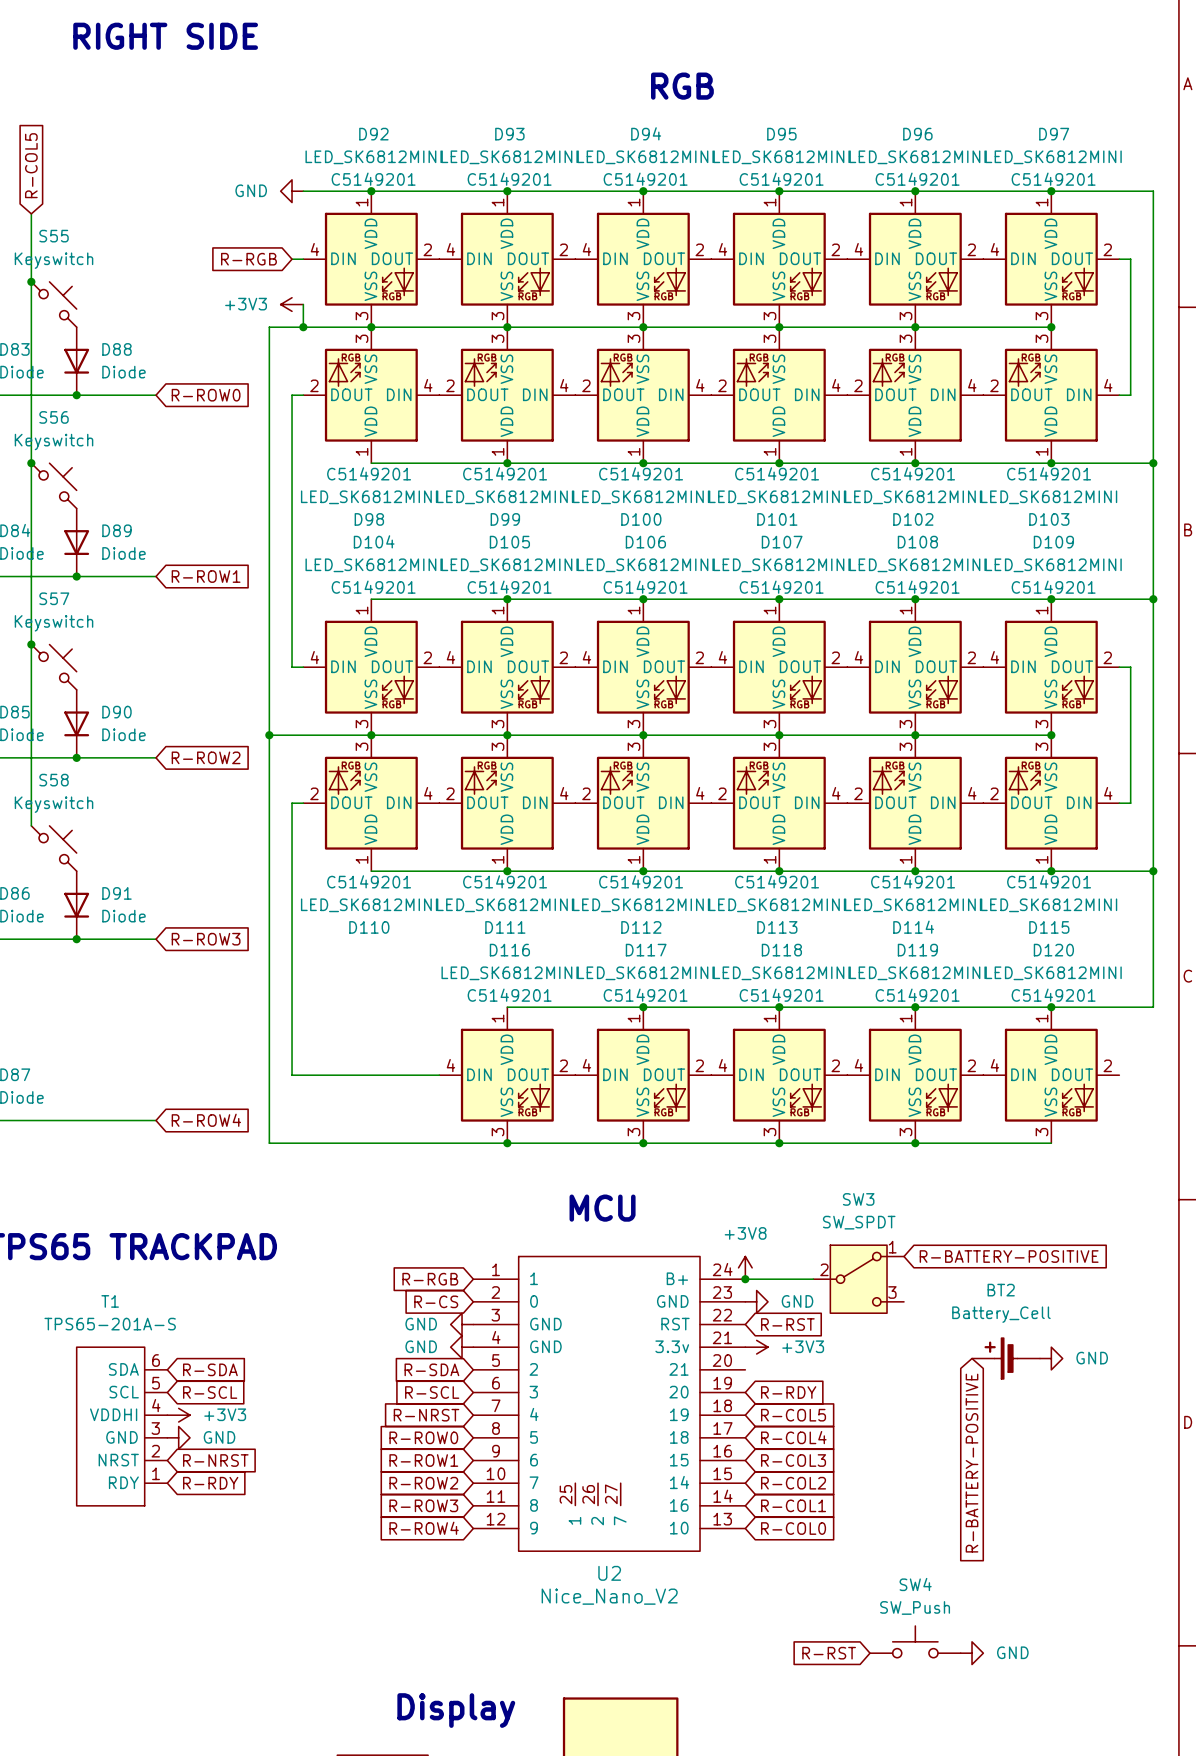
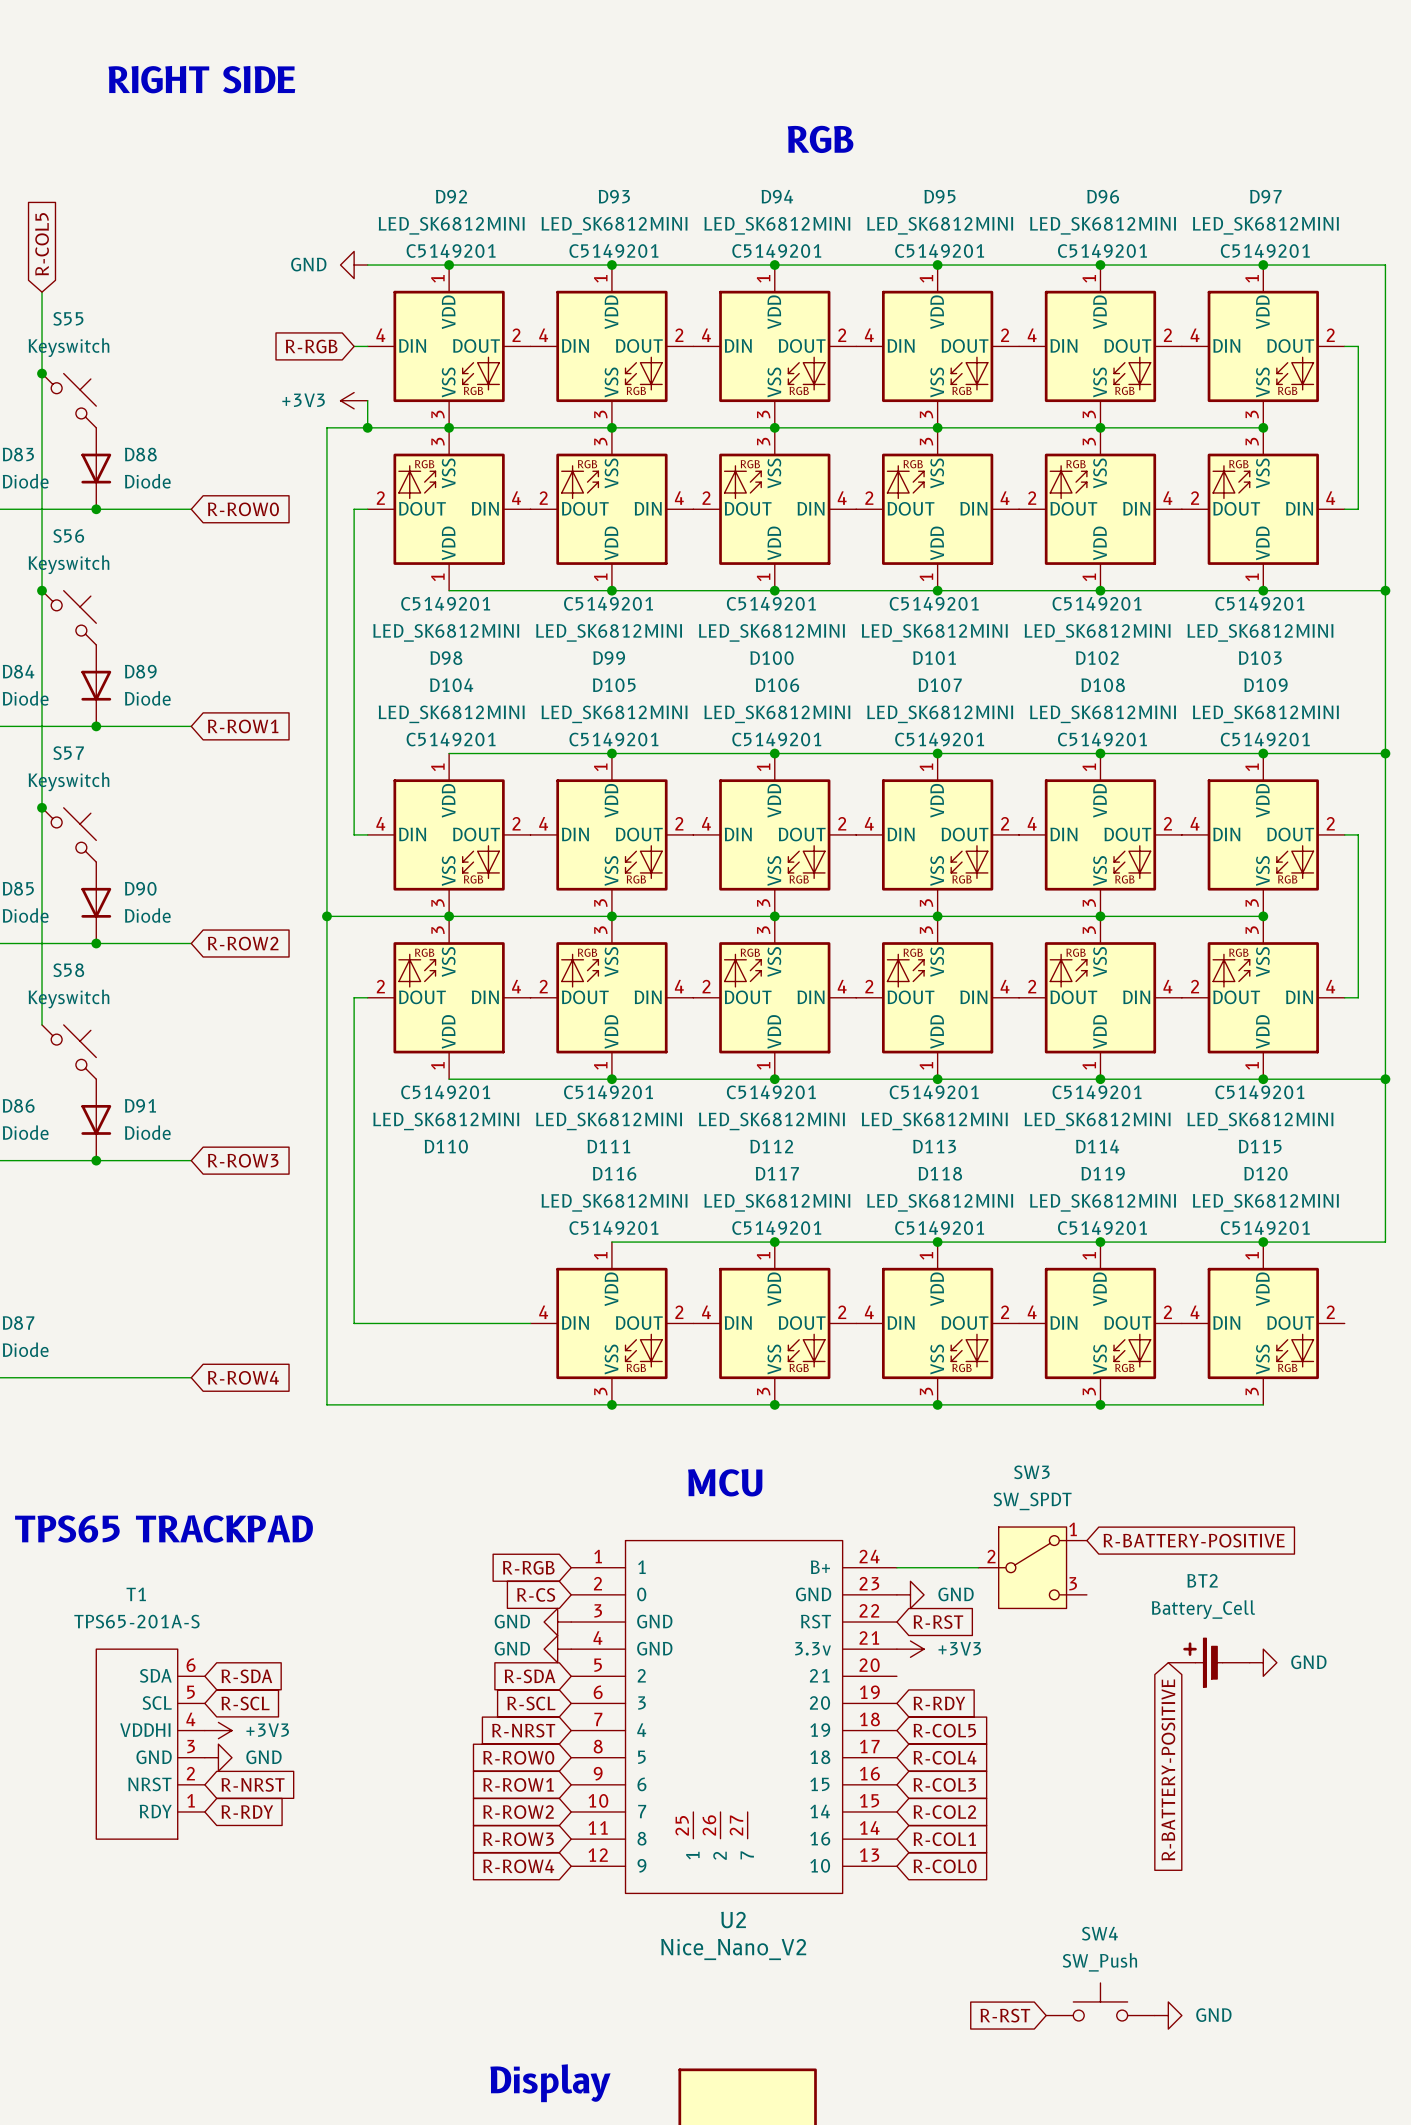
power symbol: +3V8 (745, 1267) -> none
junction: (745, 1279) -> none

